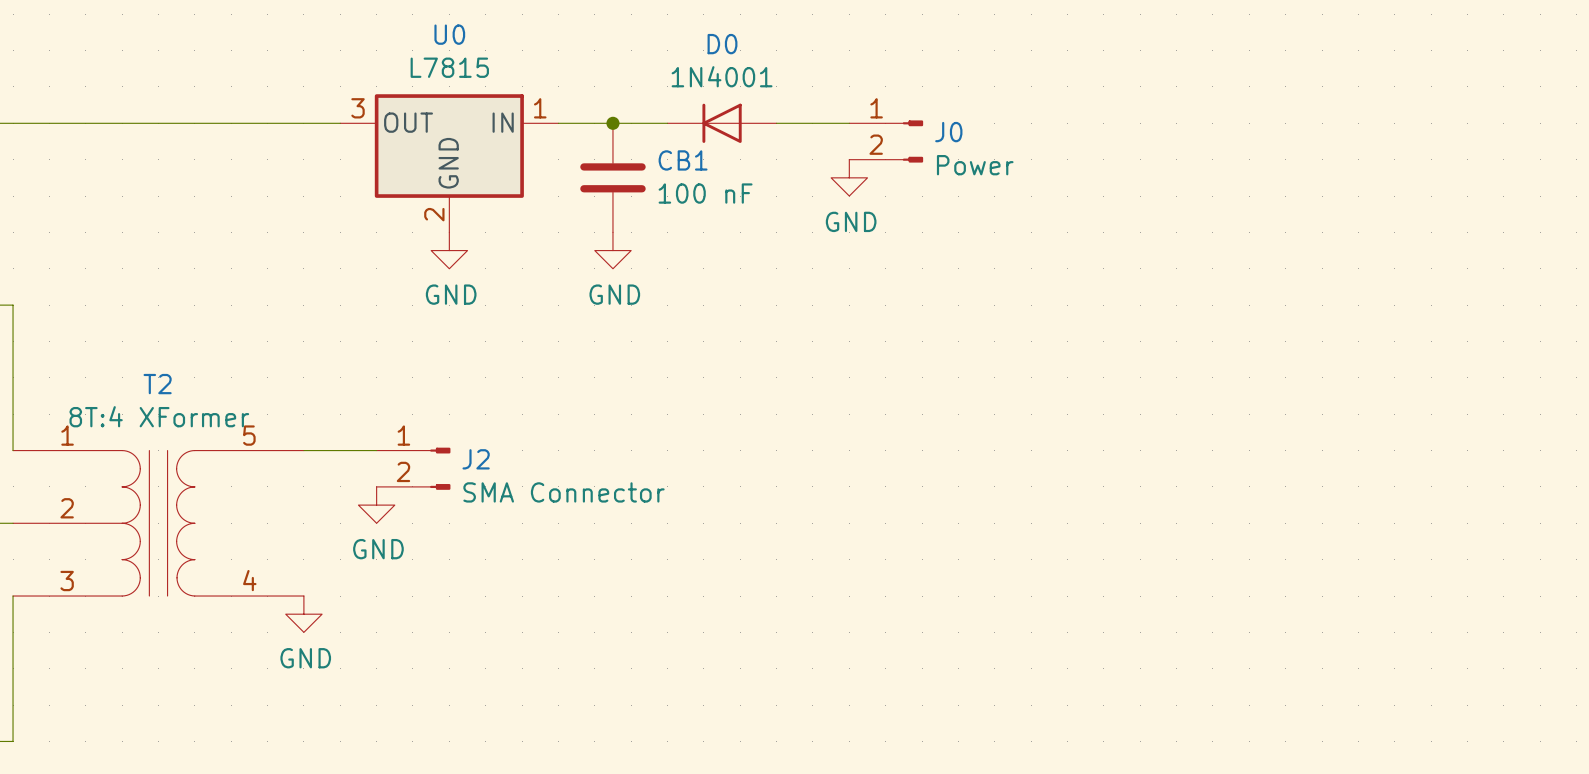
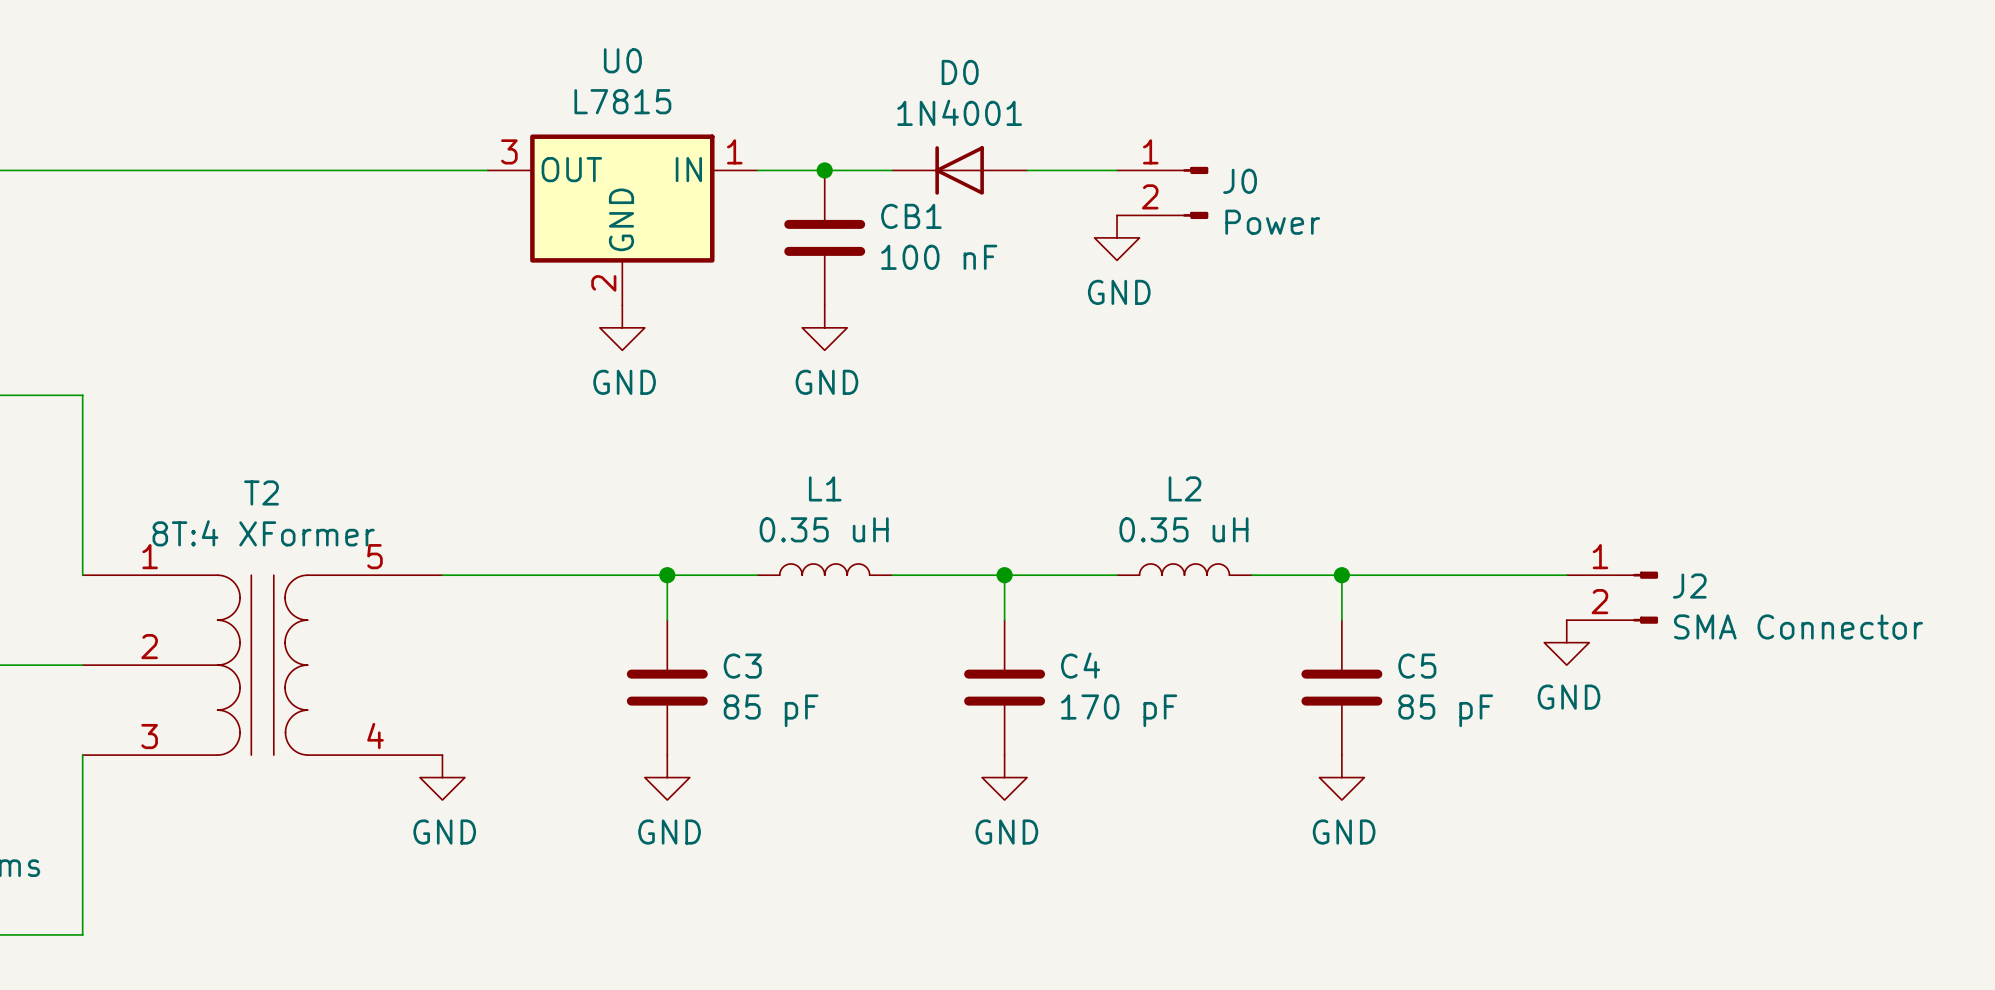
L1: none -> 0.35 uH (824, 569)
L2: none -> 0.35 uH (1184, 569)
wire: none -> (532, 575) (757, 575)
wire: none -> (667, 575) (667, 620)
junction: none -> (667, 575)
wire: none -> (892, 575) (1117, 575)
wire: none -> (1004, 575) (1004, 620)
junction: none -> (1004, 575)
wire: none -> (1251, 575) (1566, 575)
wire: none -> (1341, 575) (1341, 620)
junction: none -> (1341, 575)
J2 position: (413, 468) -> (1612, 597)
power symbol position: GND (376, 505) -> GND (667, 777)
power symbol: none -> GND (1566, 642)
C3: none -> 85 pF (667, 687)
C4: none -> 170 pF (1004, 687)
C5: none -> 85 pF (1341, 687)
power symbol: none -> GND (1004, 777)
power symbol: none -> GND (1341, 777)

